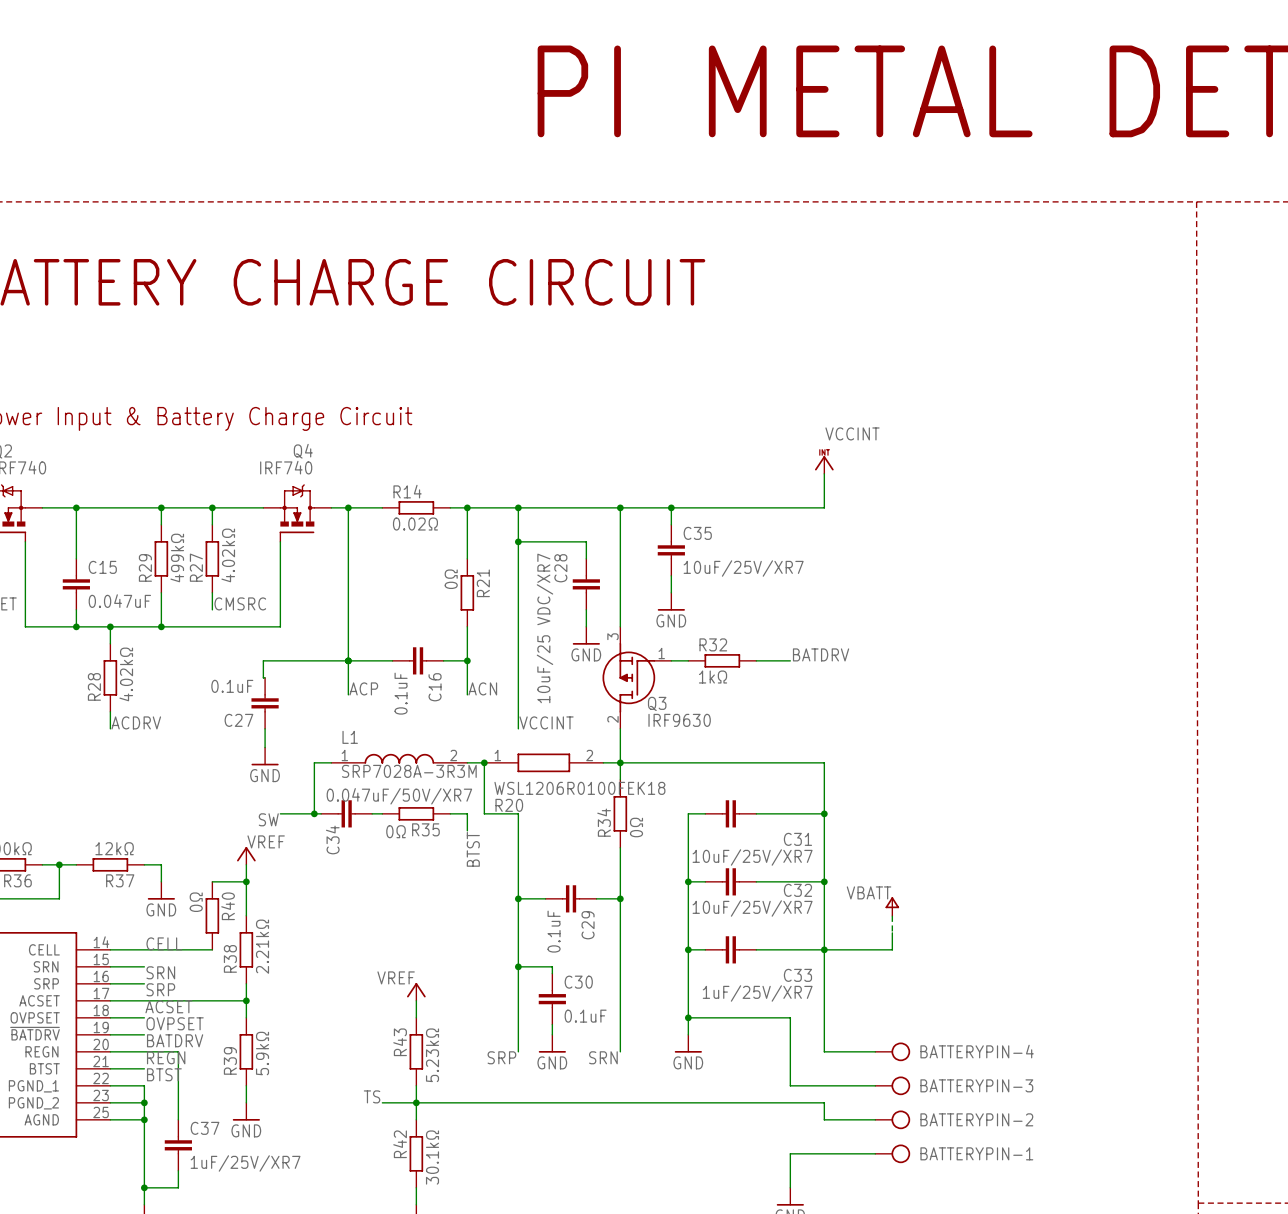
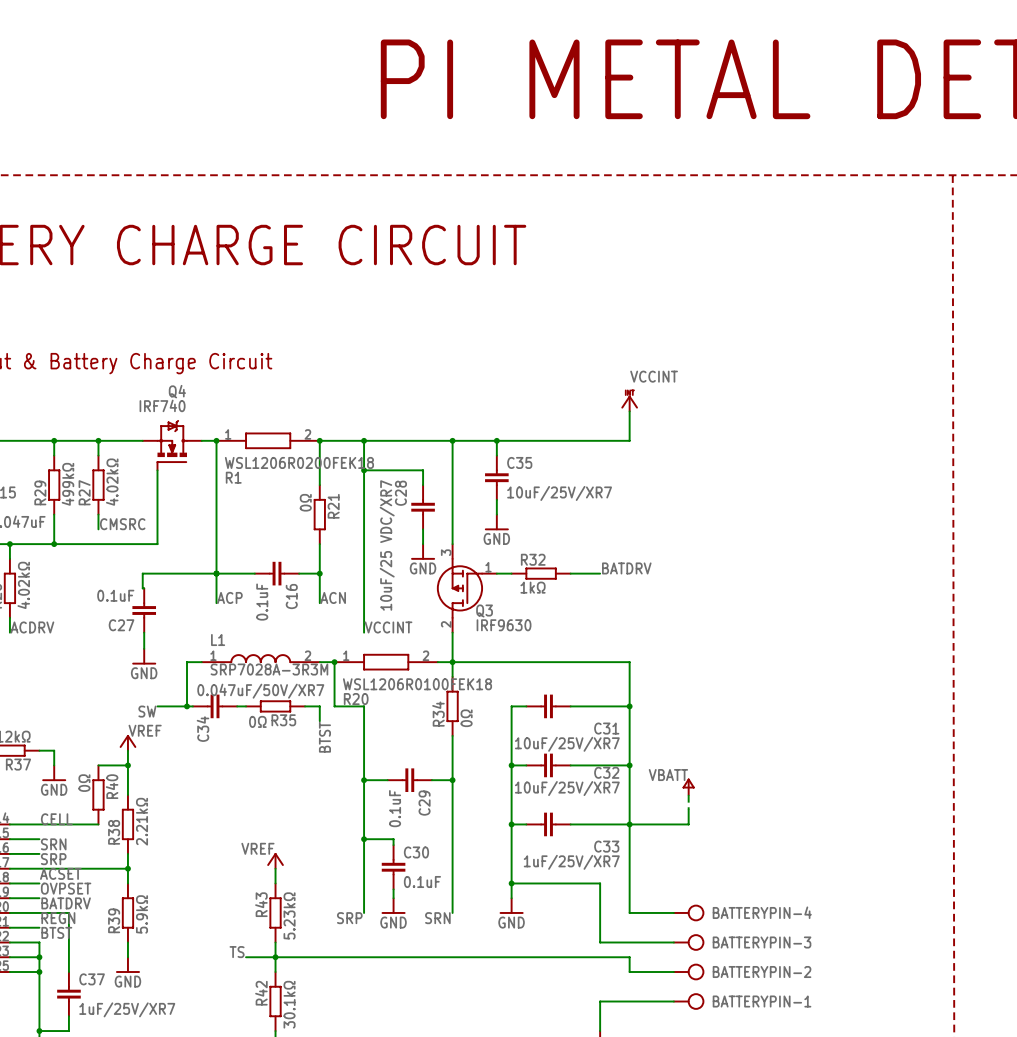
R1: none -> WSL1206R0200FEK18 (268, 440)
R14: 0.02Ω (416, 507) -> none

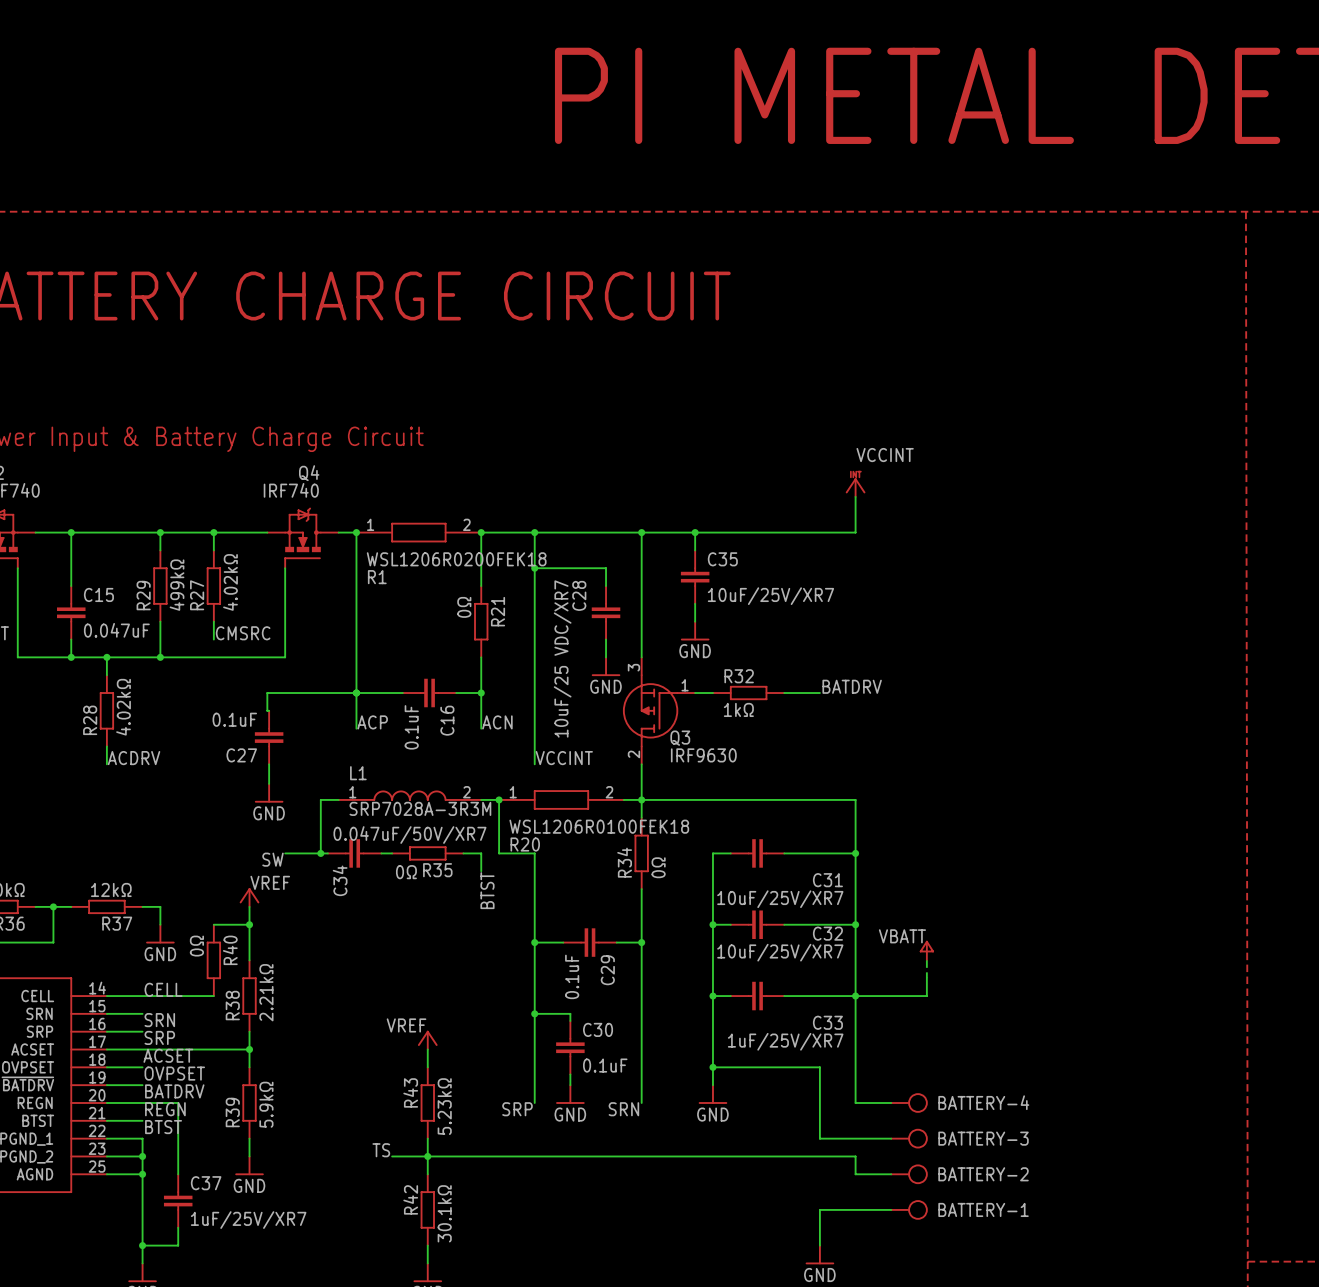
BATTERY-4: none -> (909, 1102)
BATTERYPIN-4: (689, 912) -> none
BATTERY-3: none -> (909, 1138)
BATTERYPIN-3: (689, 942) -> none
BATTERY-2: none -> (909, 1174)
BATTERYPIN-2: (689, 972) -> none
BATTERY-1: none -> (909, 1209)
BATTERYPIN-1: (689, 1001) -> none

